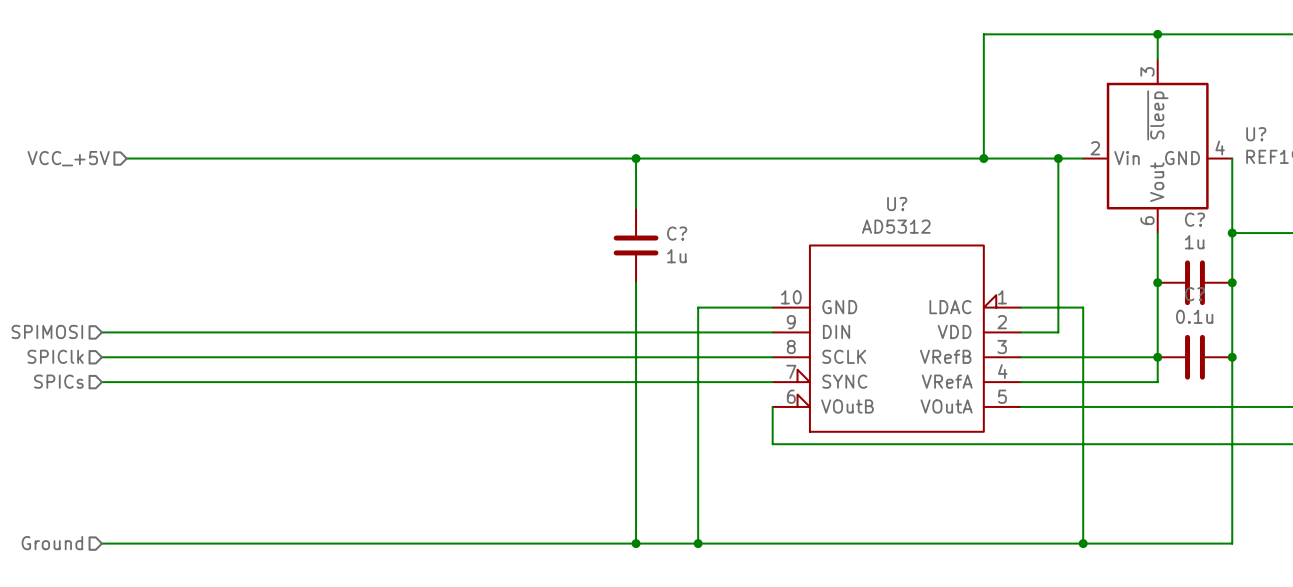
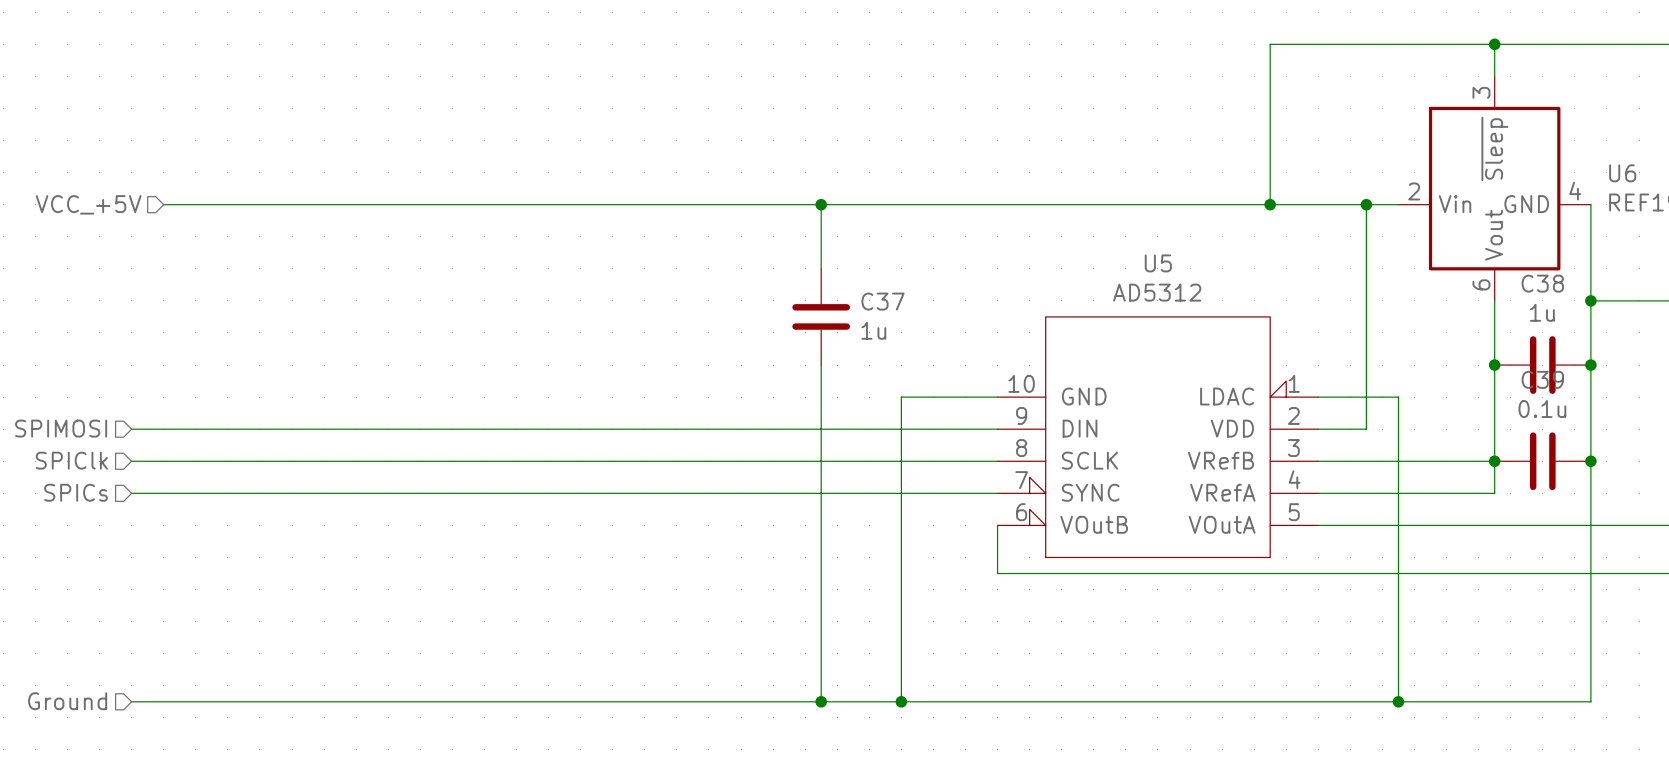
U? name: U? (1256, 134) -> U6 (1622, 173)
U? name: U? (897, 204) -> U5 (1158, 263)
C? name: C? (1194, 219) -> C38 (1542, 283)
C? name: C? (677, 233) -> C37 (883, 301)
C? name: C? (1194, 294) -> C39 (1542, 379)

